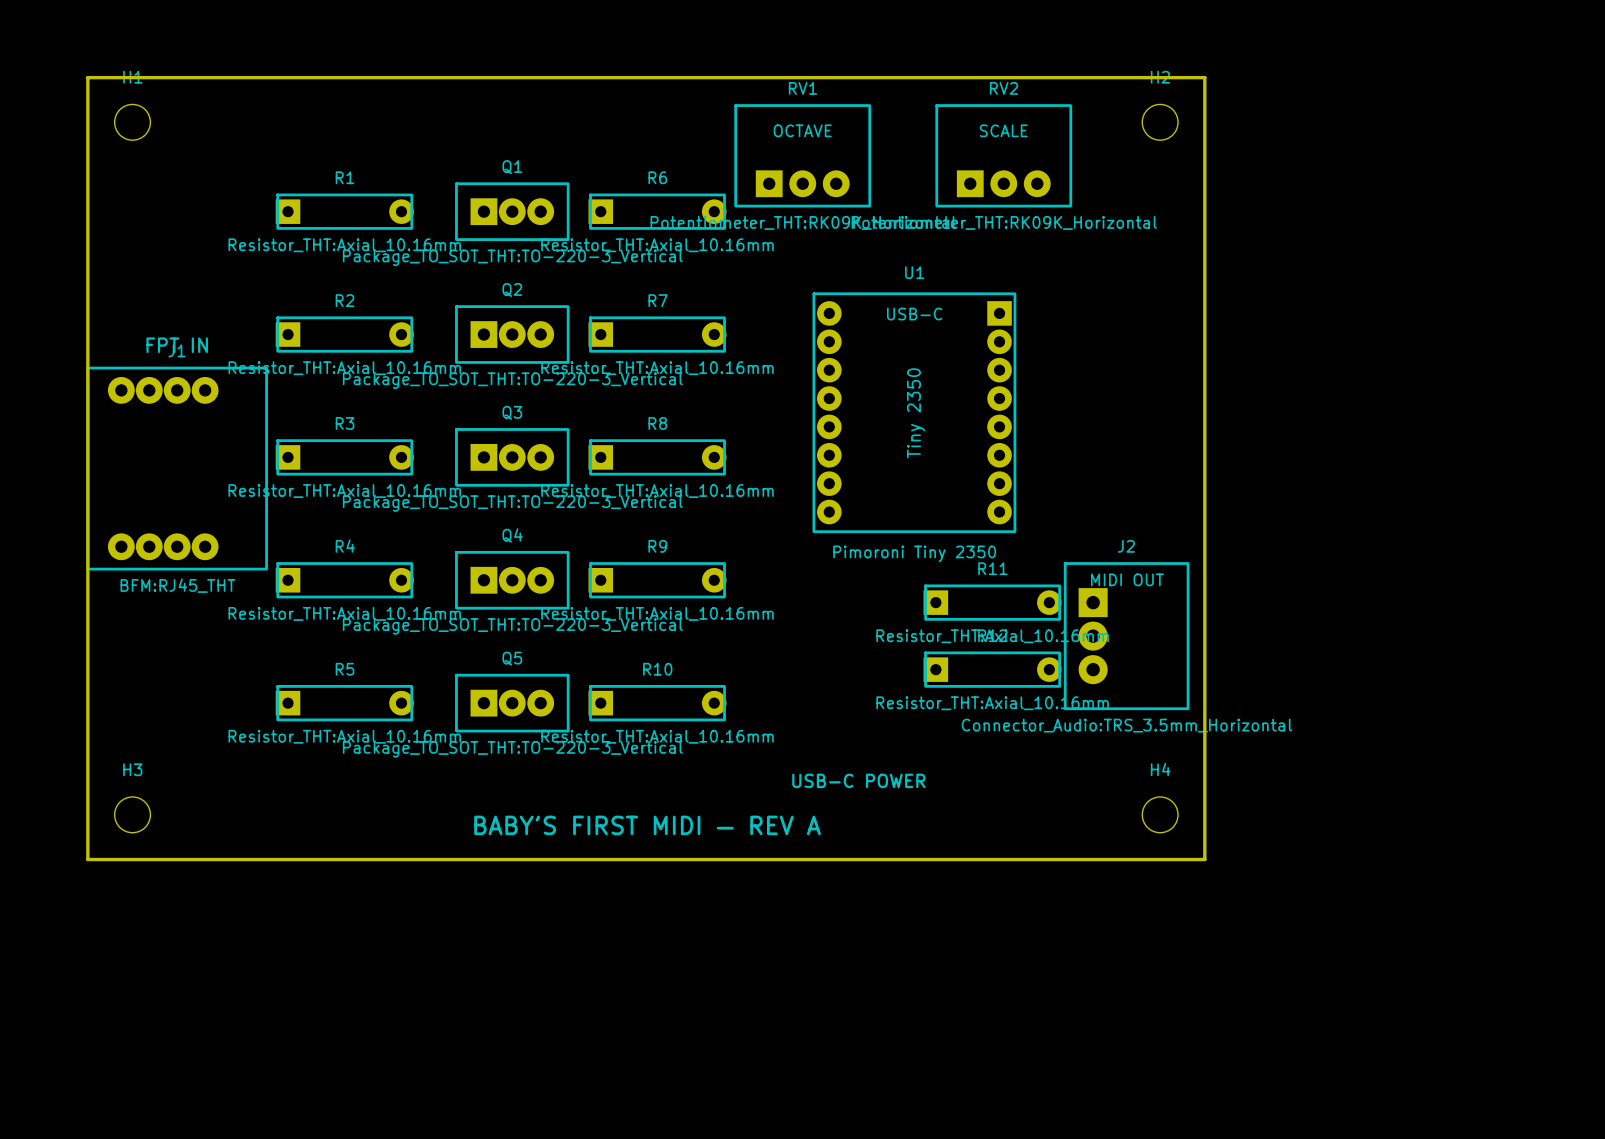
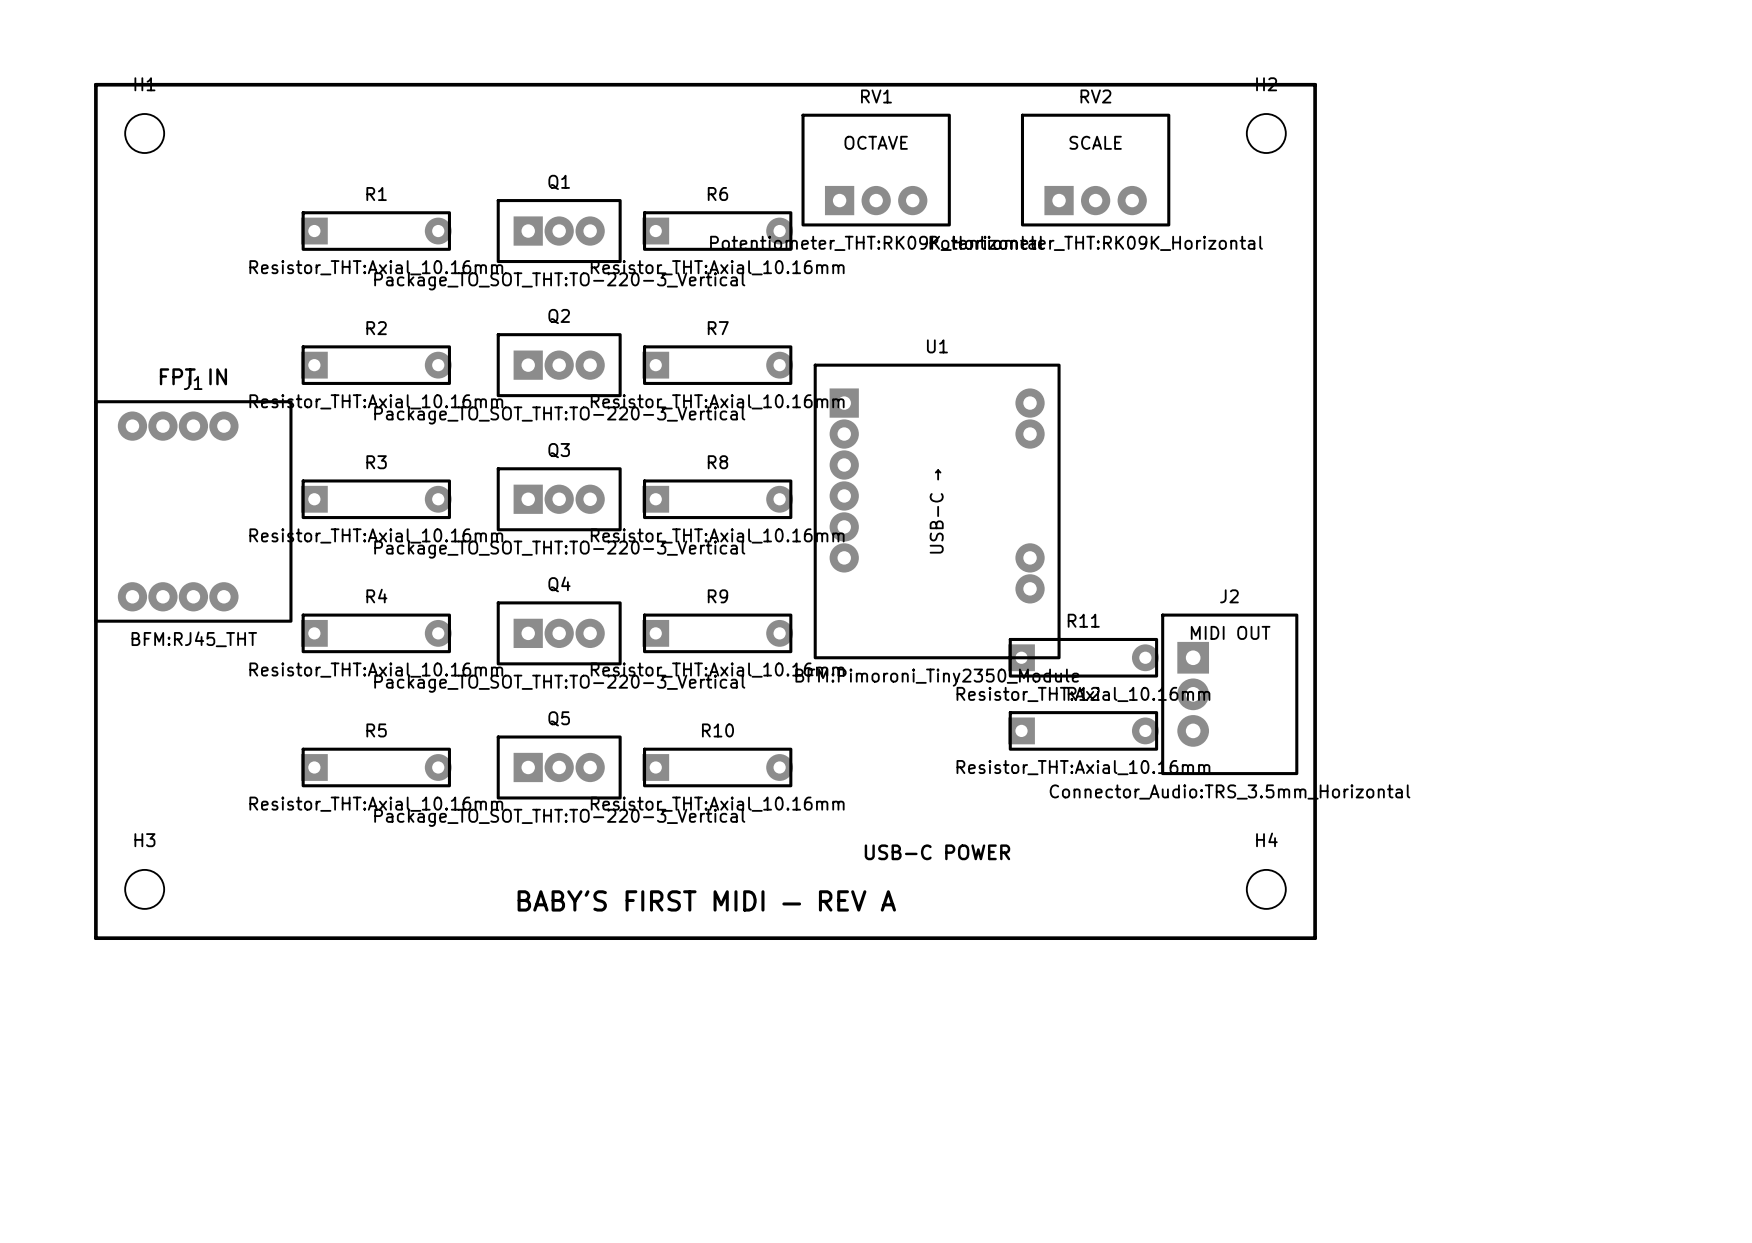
U1 footprint: [812, 292, 1017, 534] -> [813, 363, 1061, 660]
U1 value: Pimoroni Tiny 2350 (914, 553) -> BFM:Pimoroni_Tiny2350_Module (937, 677)

